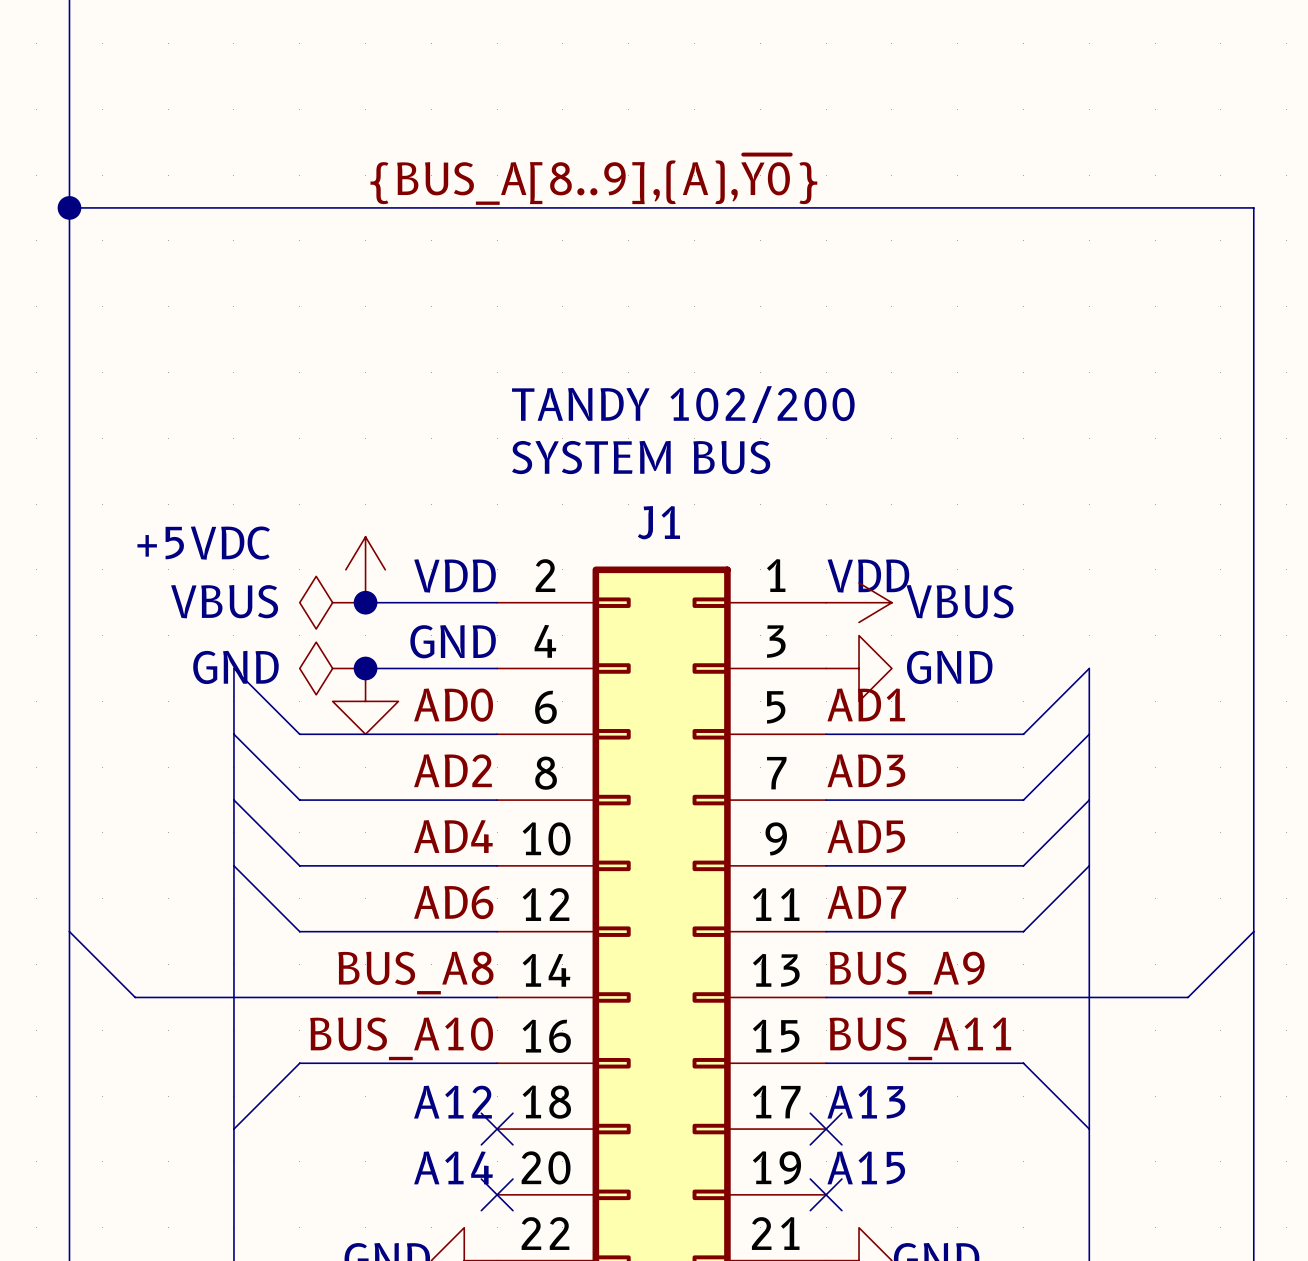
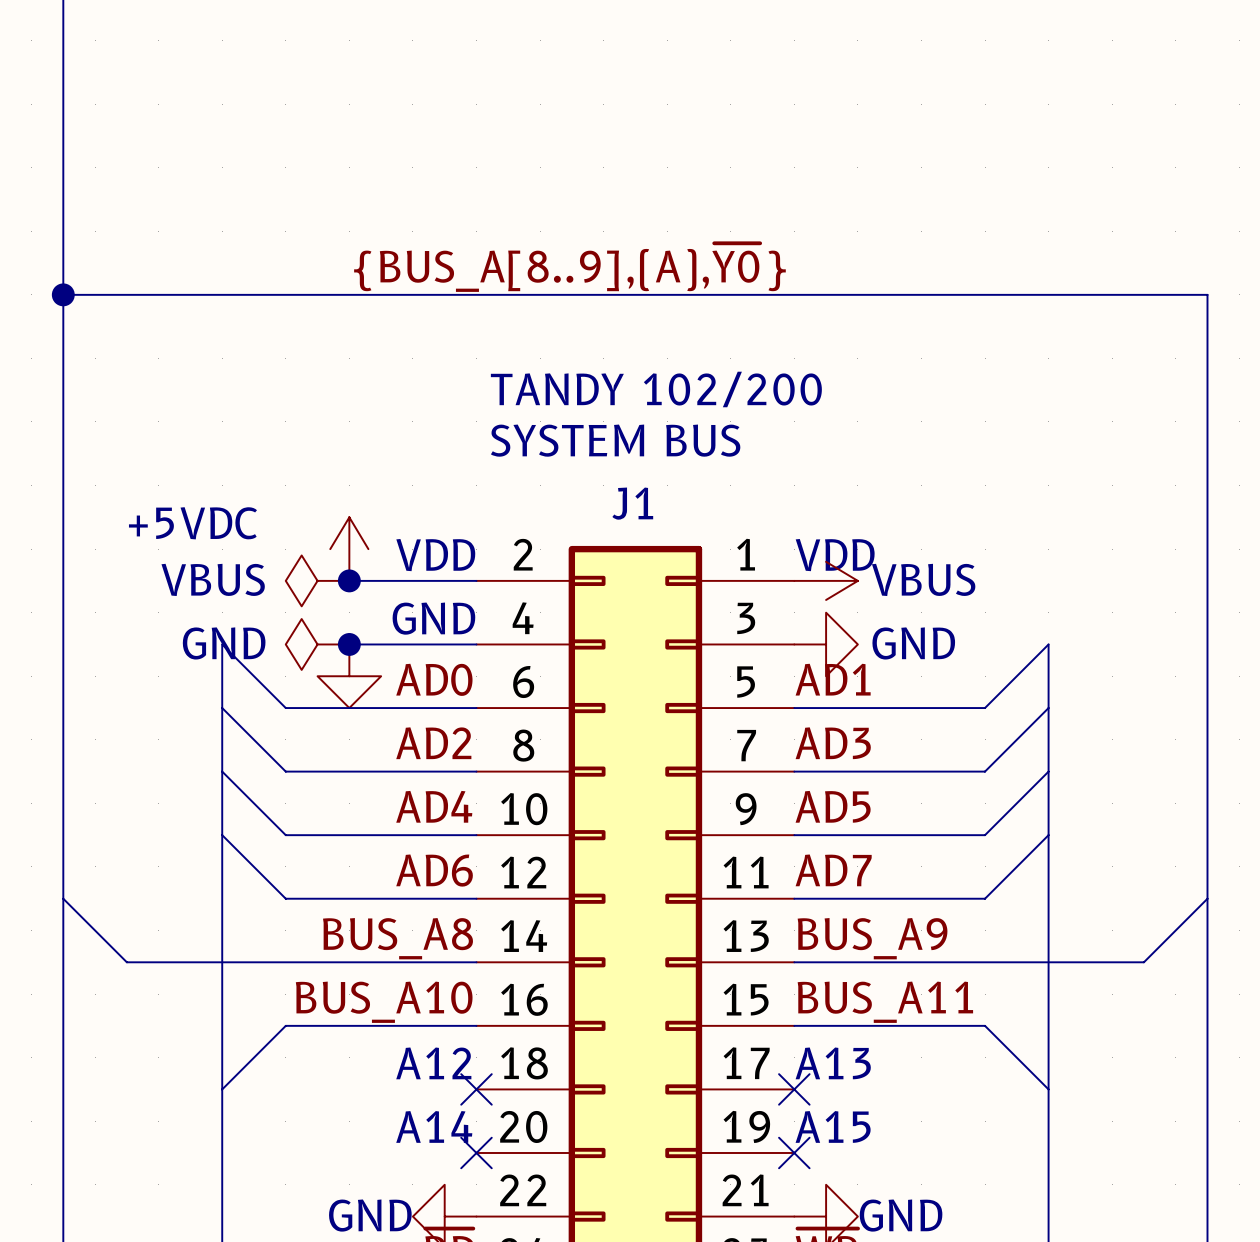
label position: {BUS_A[8..9],(A),~{Y0}} (593, 179) -> {BUS_A[8..9],(A),~{Y0}} (569, 267)
bus: (69, 207) (1253, 207) (1253, 306) -> (63, 294) (1207, 294)
junction position: (69, 207) -> (63, 294)

